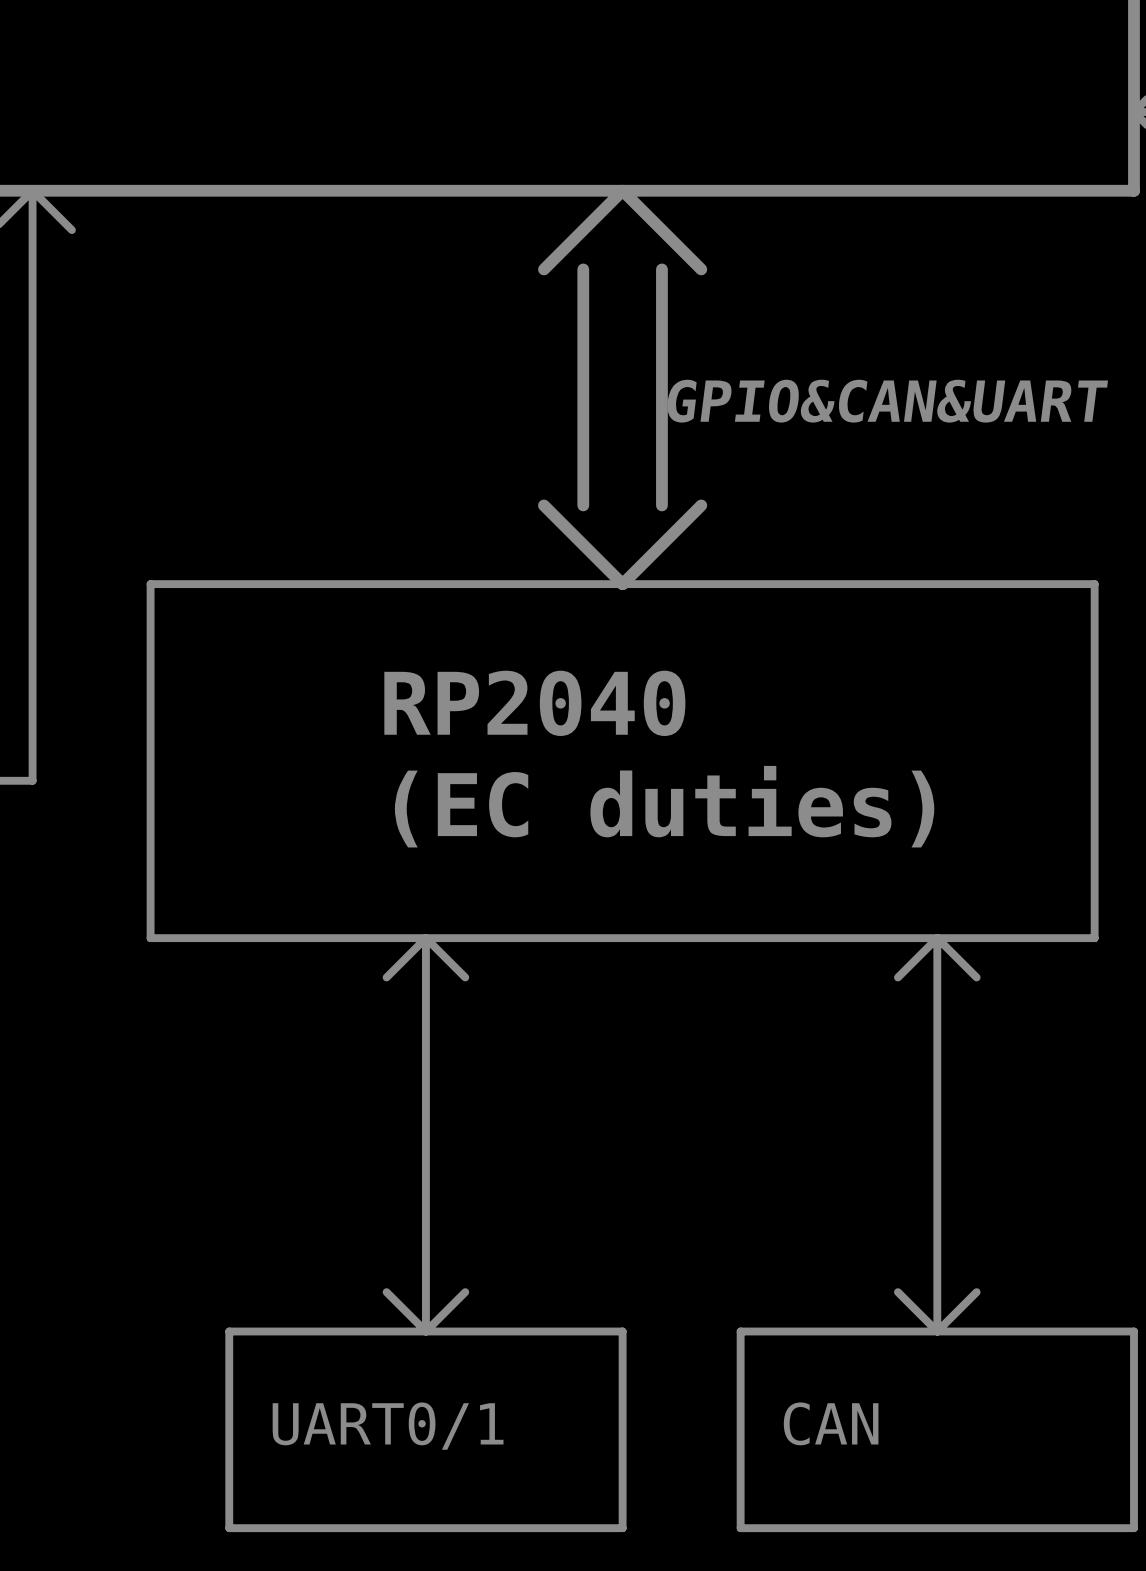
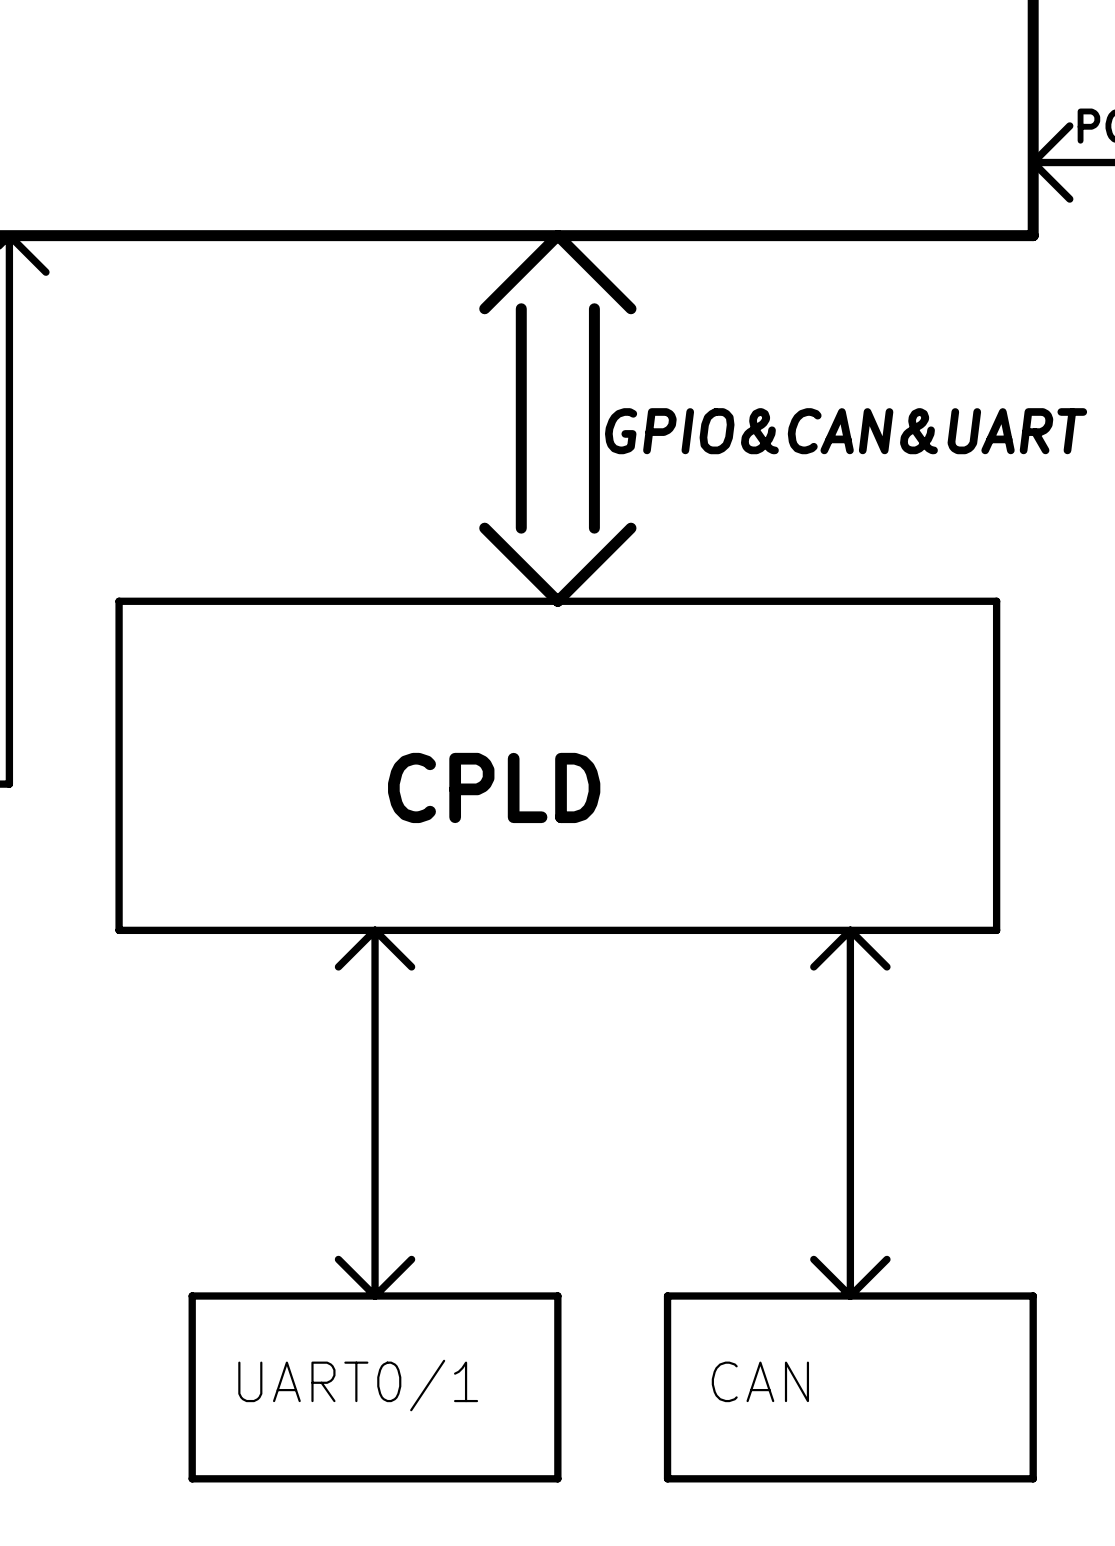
text: RP2040 (534, 703) -> none
text: none -> CPLD (494, 787)
text: (EC duties) (664, 806) -> none

